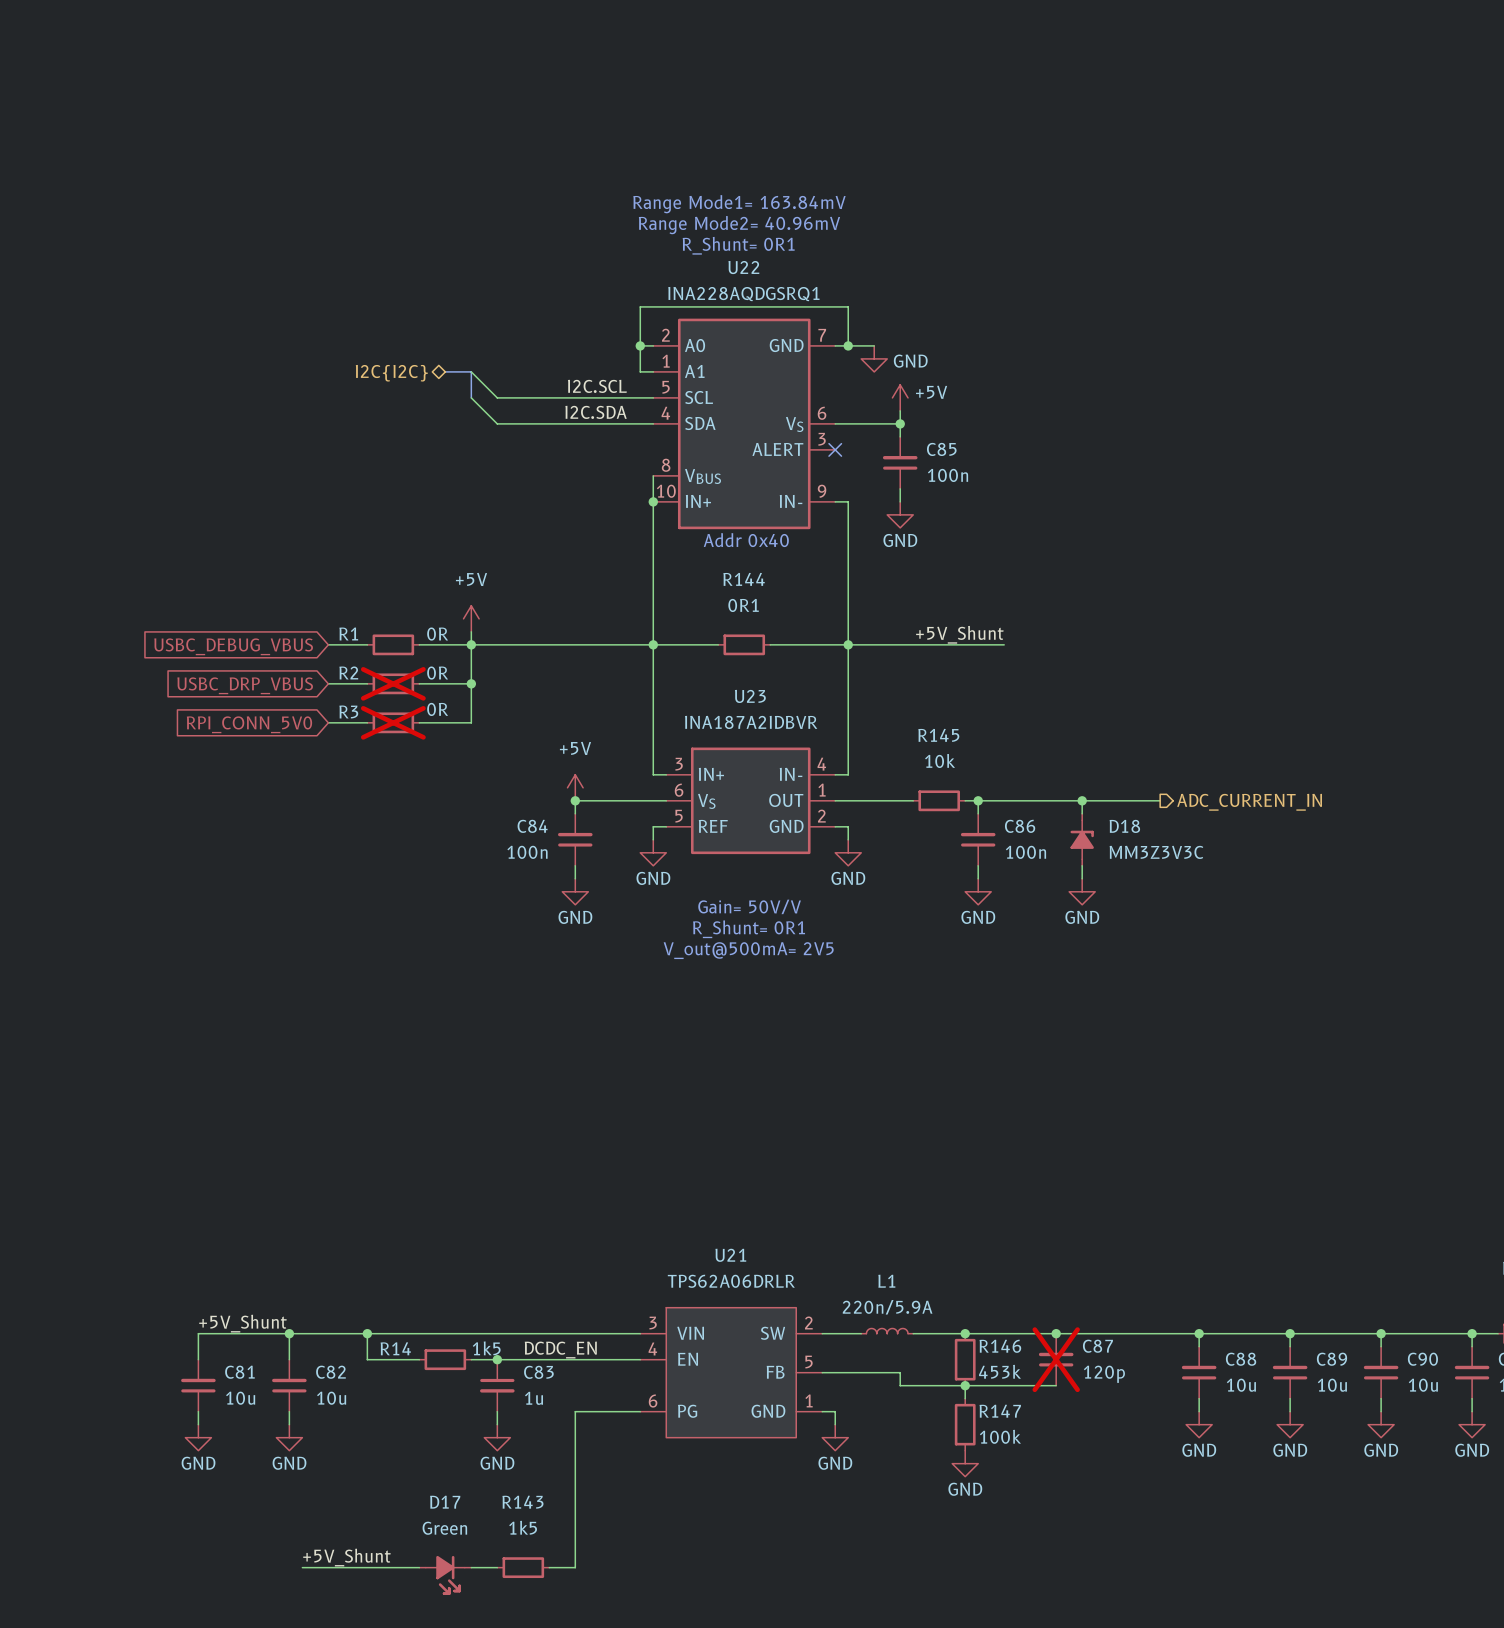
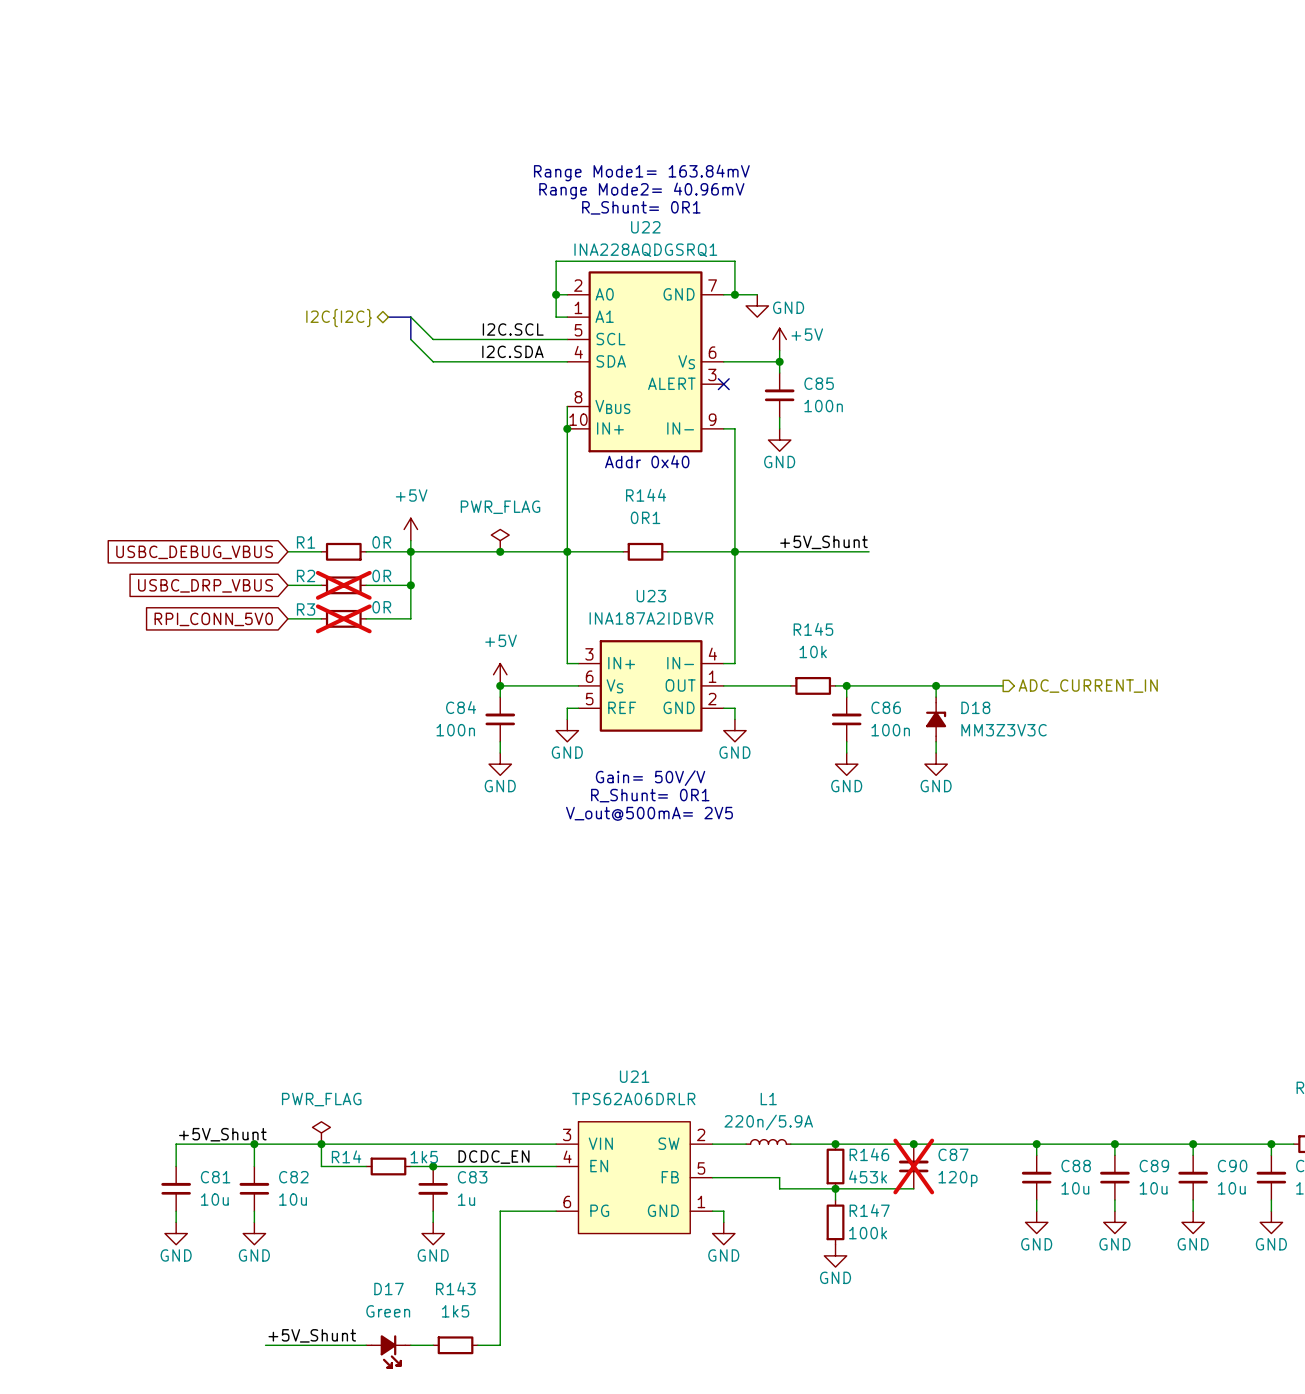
power symbol: none -> PWR_FLAG (500, 540)
junction: none -> (500, 551)
power symbol: none -> PWR_FLAG (321, 1132)

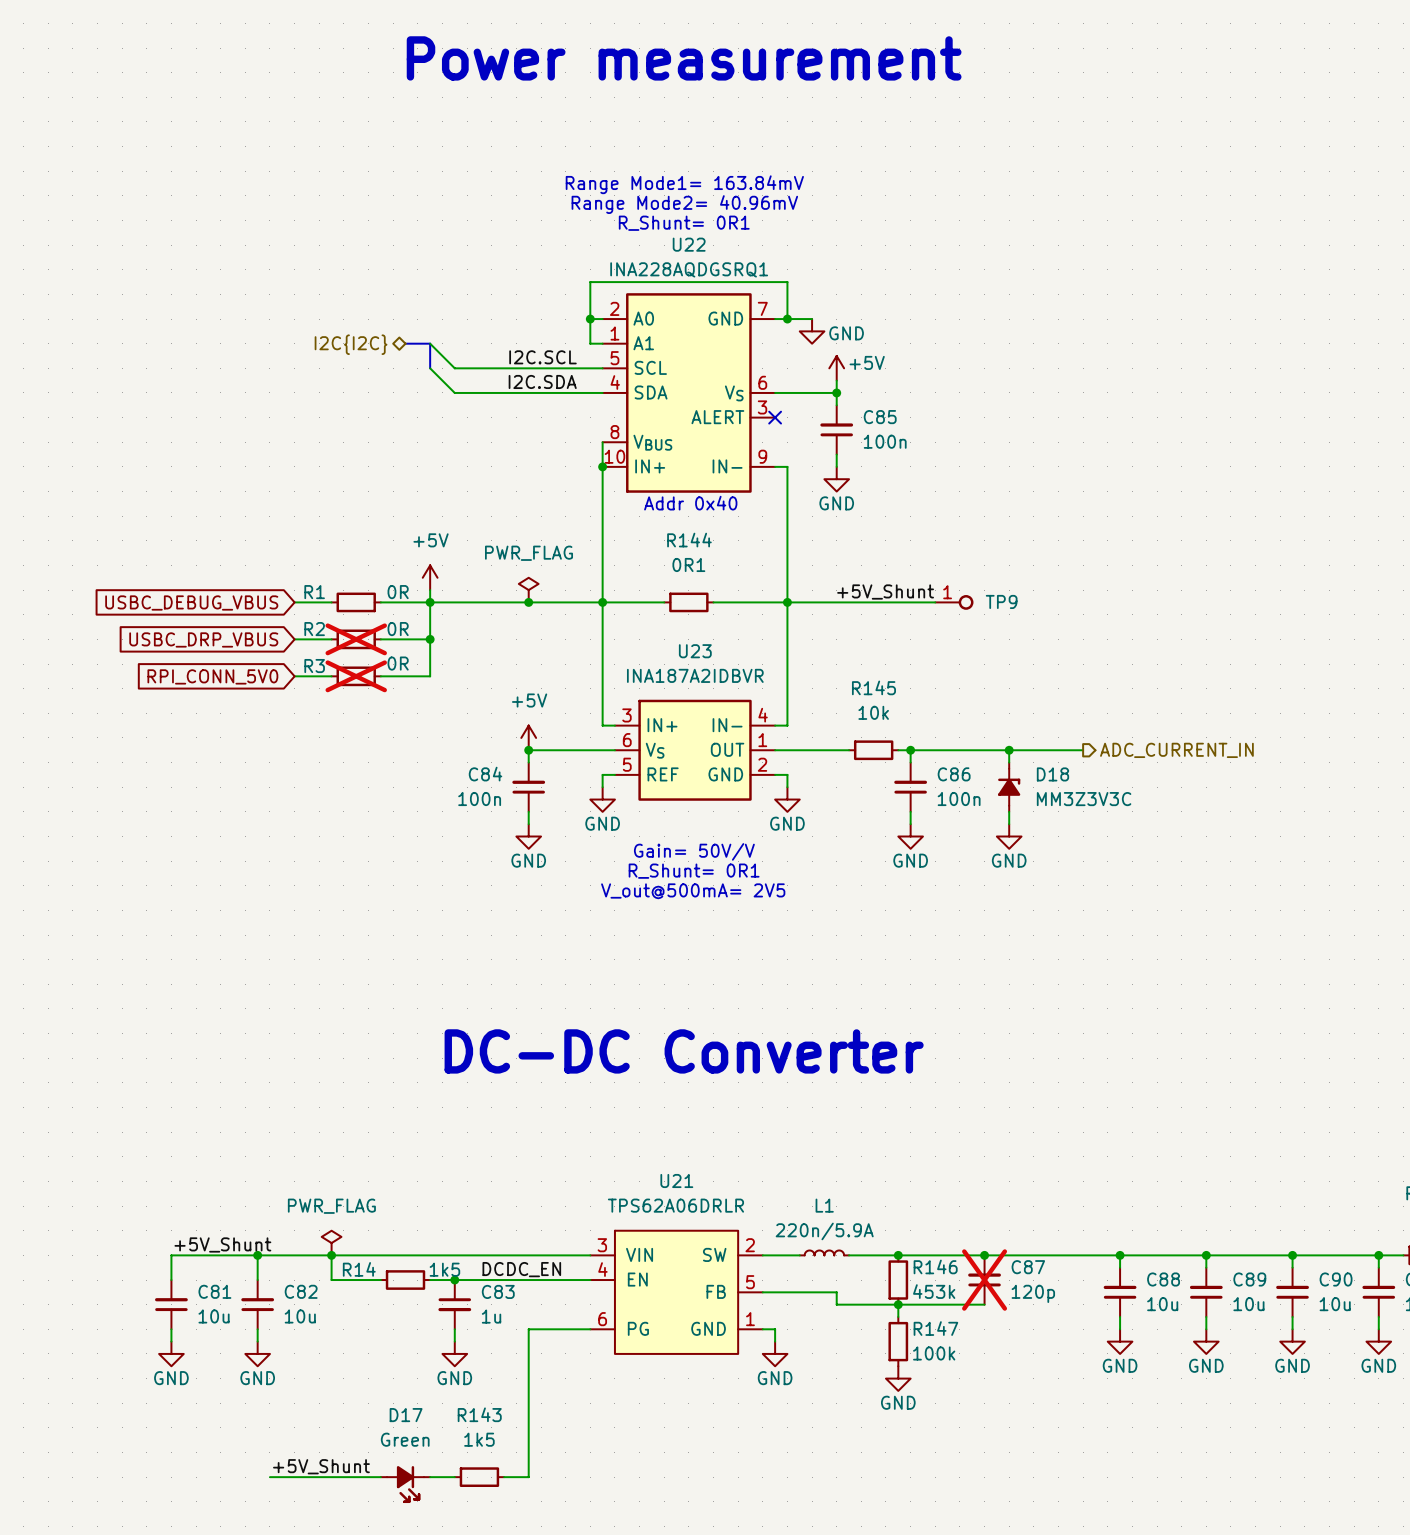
text: none -> Power measurement (684, 58)
TP9: none -> (954, 602)
text: none -> DC-DC Converter (684, 1051)

